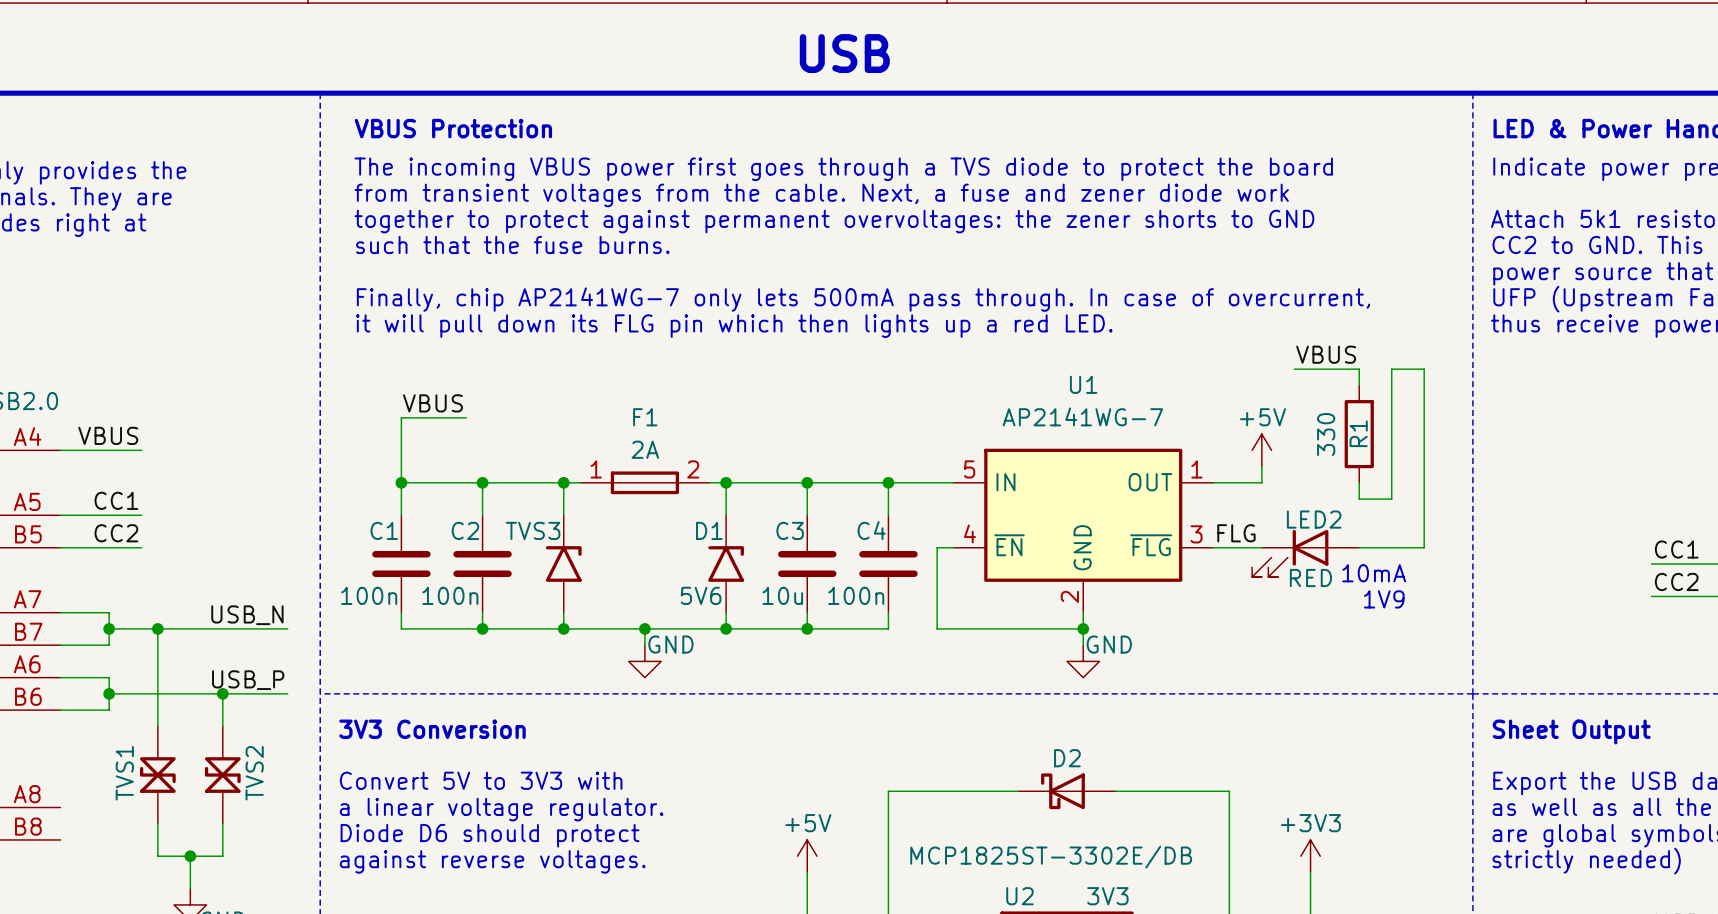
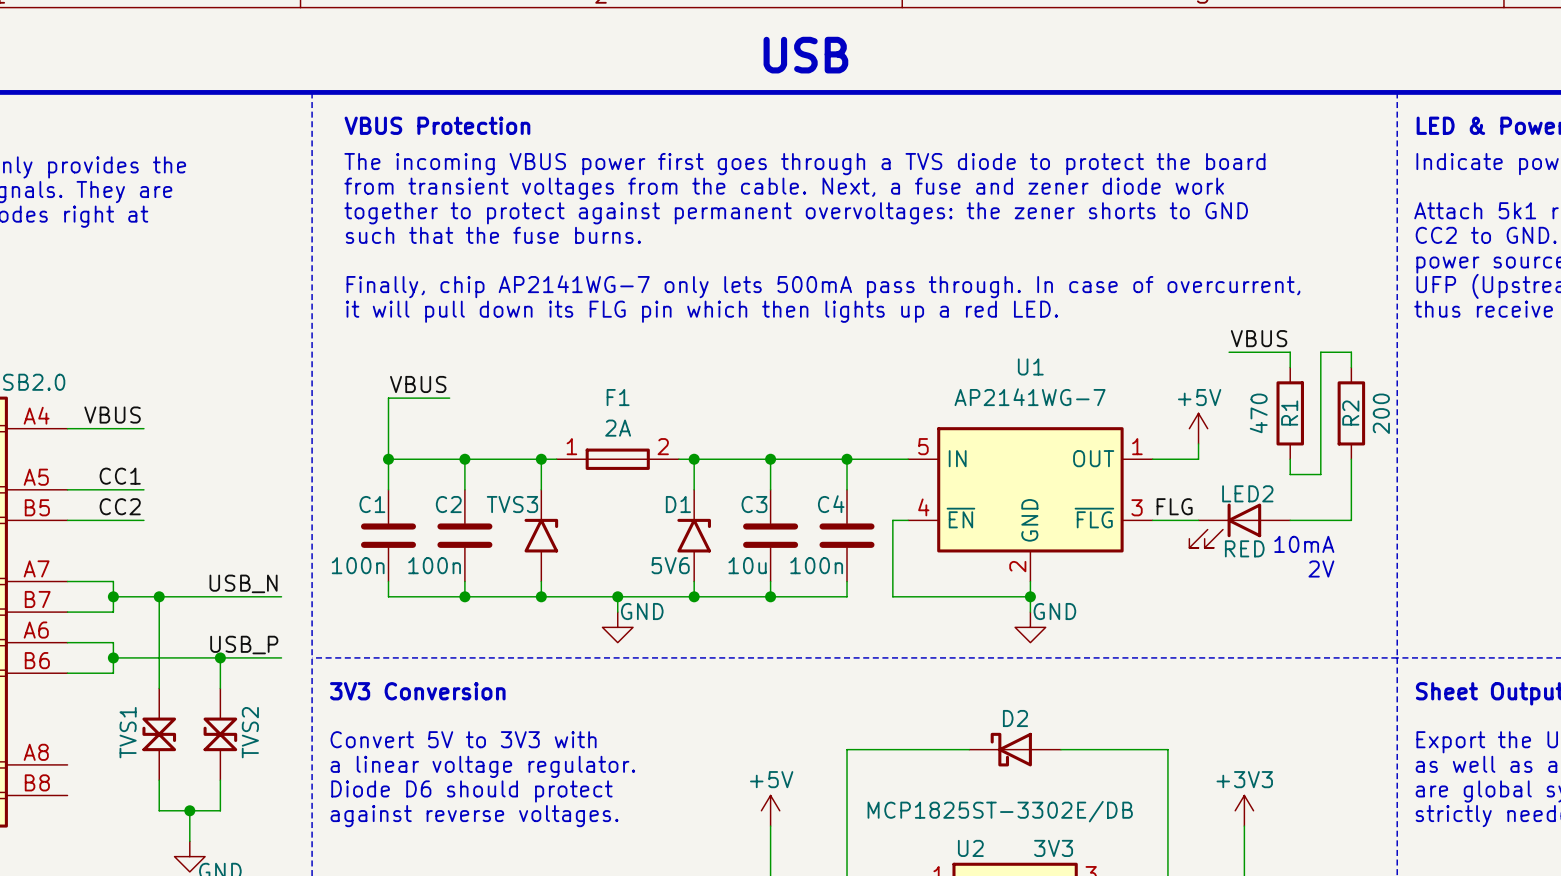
wire: (1424, 385) (1424, 482) -> none
R1 value: 330 (1326, 434) -> 470 (1258, 413)
R2: none -> 200 (1351, 413)
text: 1V9 (1384, 599) -> 2V (1321, 569)

